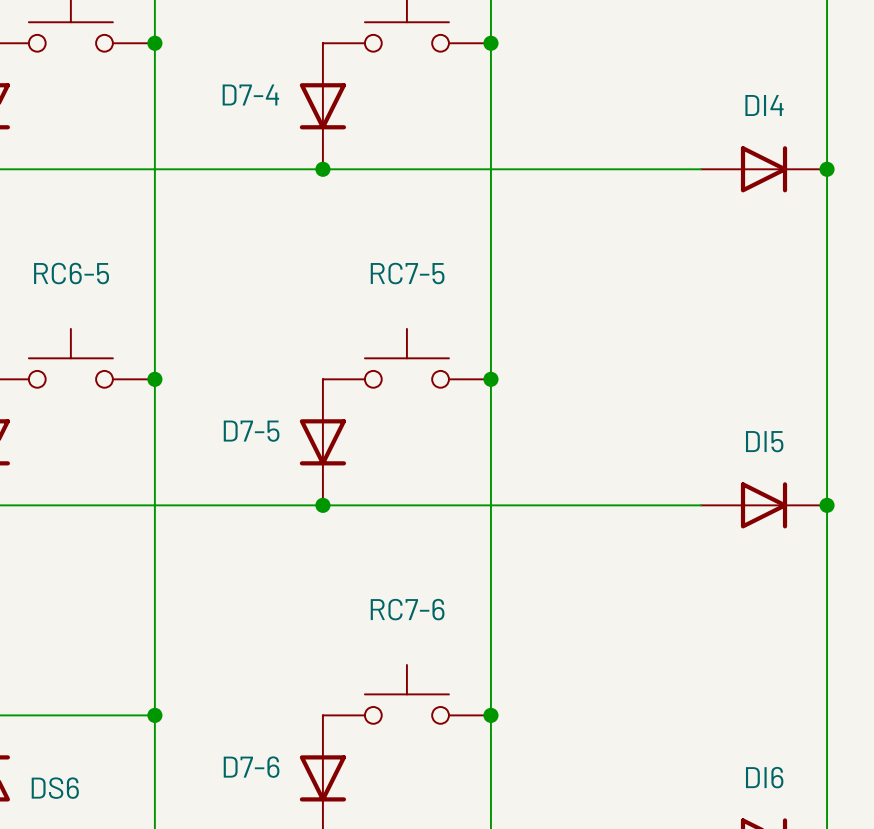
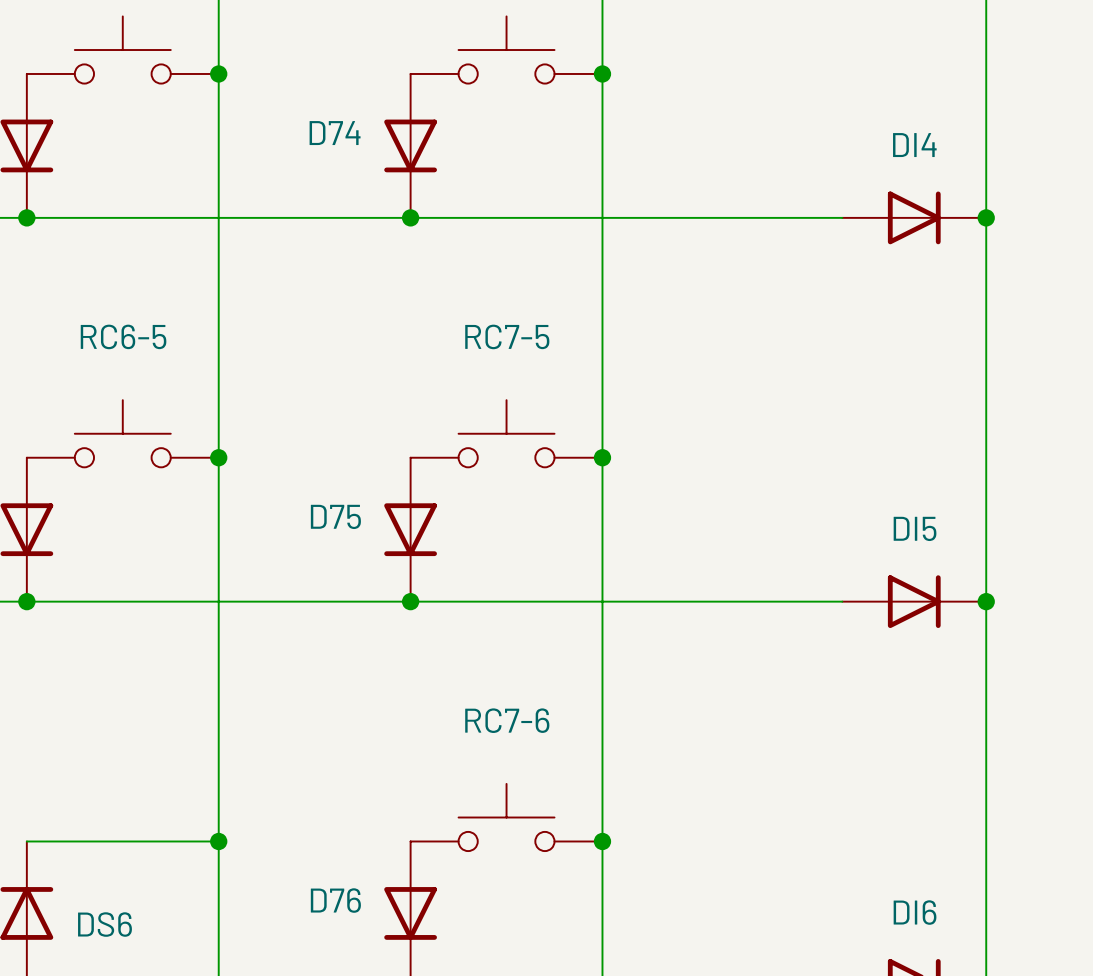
D7-4 name: D7-4 (250, 94) -> D74 (335, 133)
D7-5 name: D7-5 (251, 431) -> D75 (335, 516)
D7-6 name: D7-6 (251, 767) -> D76 (335, 900)

